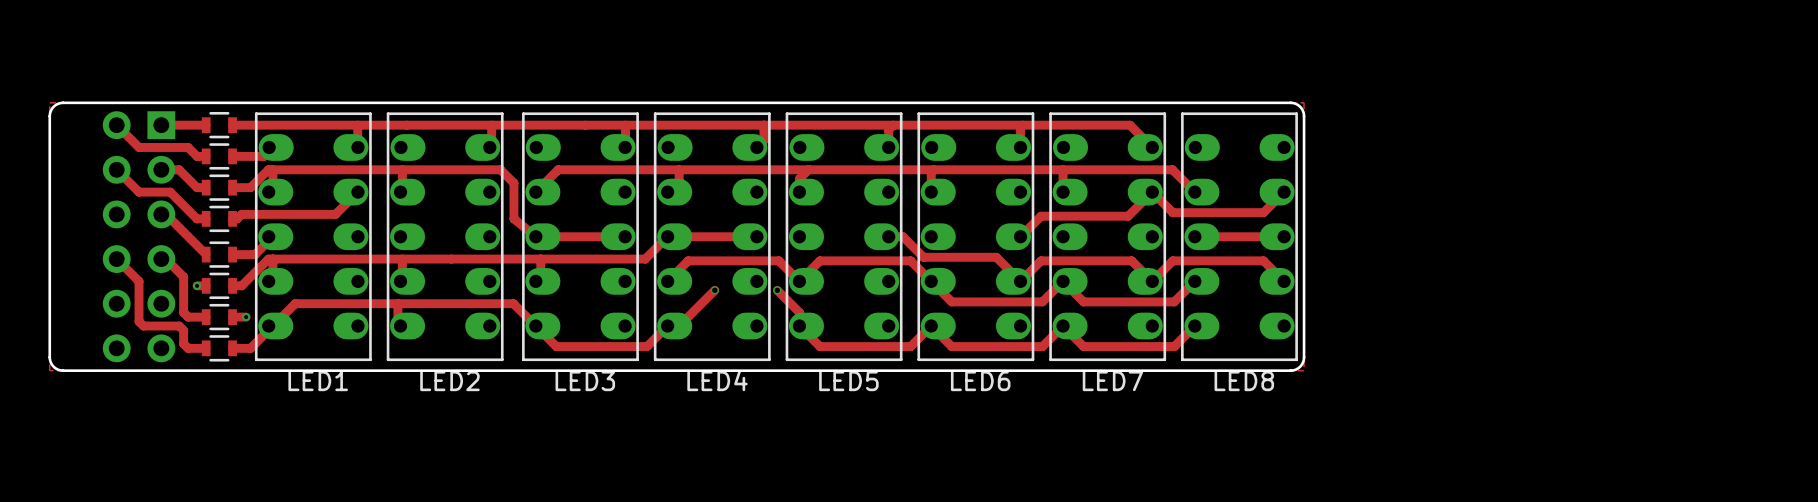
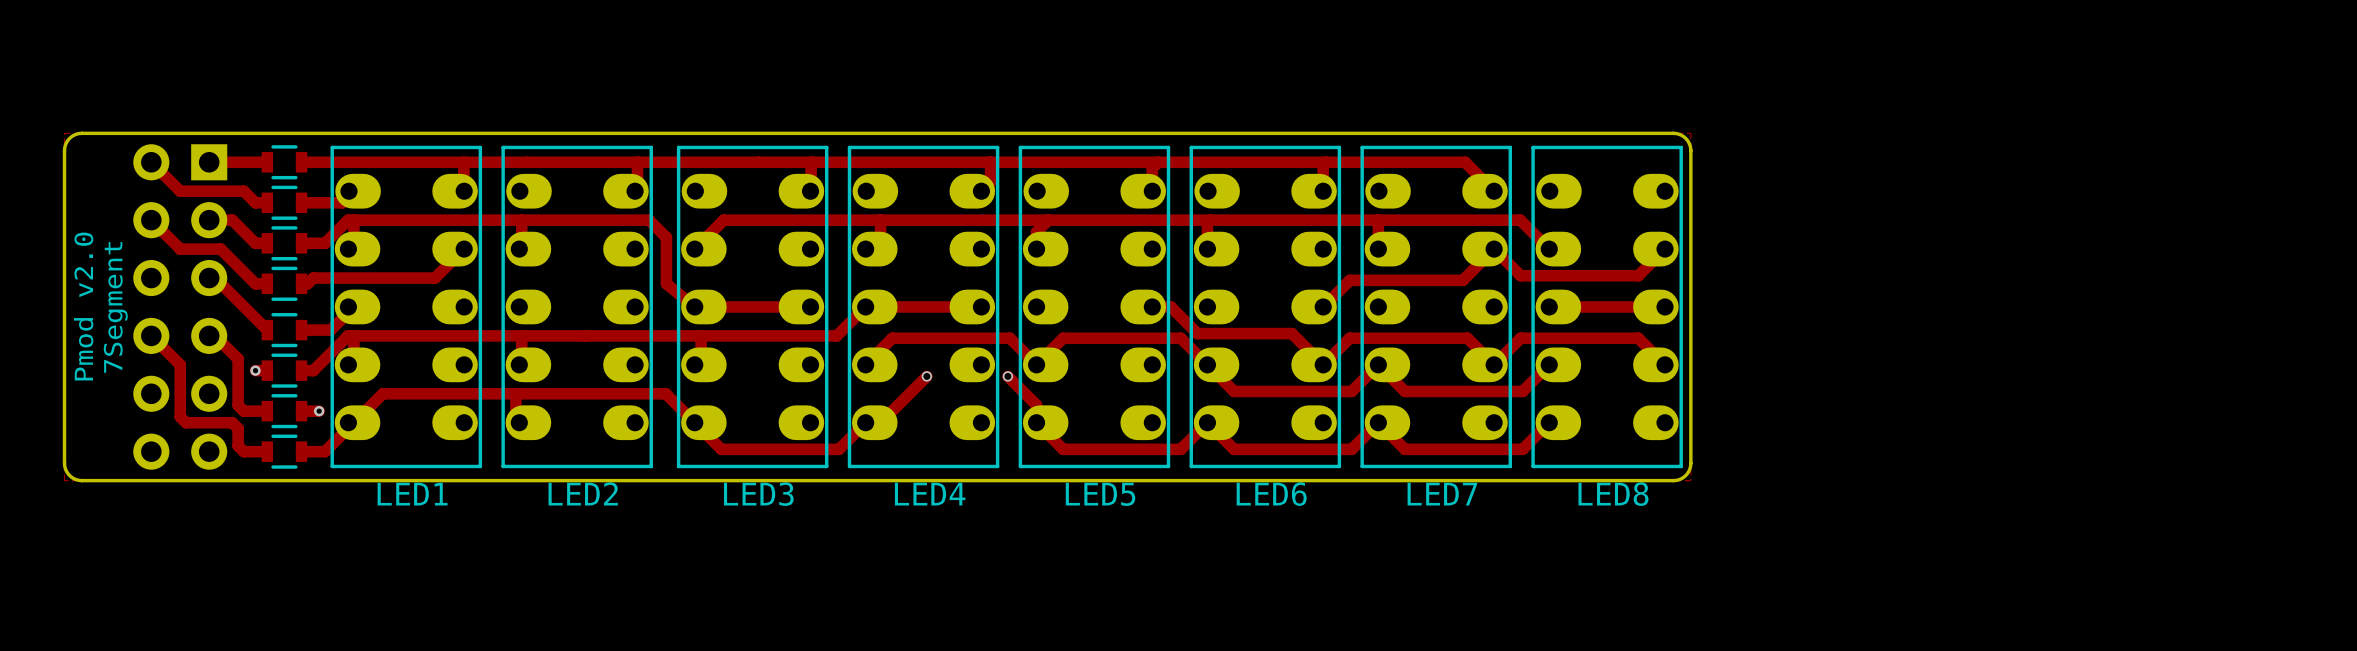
text: none -> Pmod v2.0 (83, 306)
text: none -> 7Segment (115, 307)

